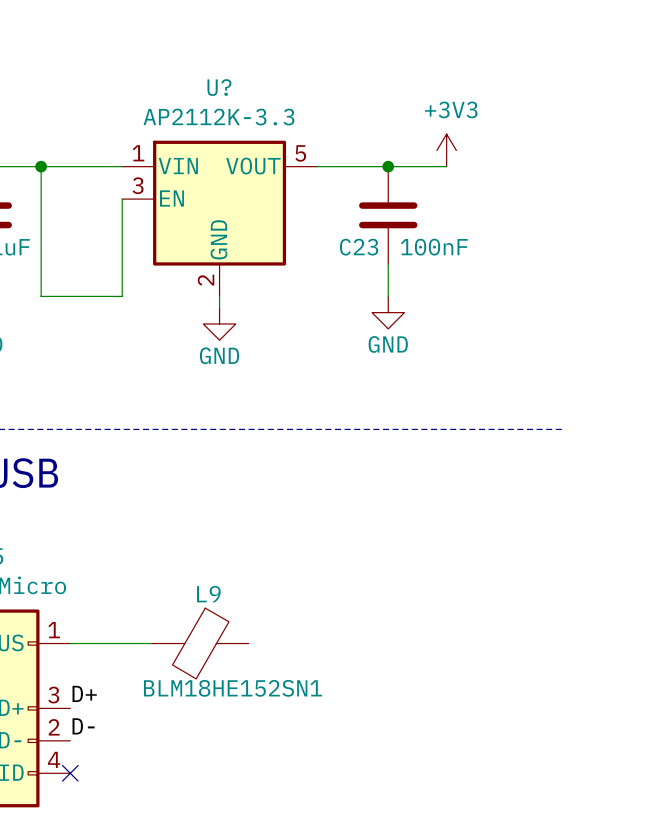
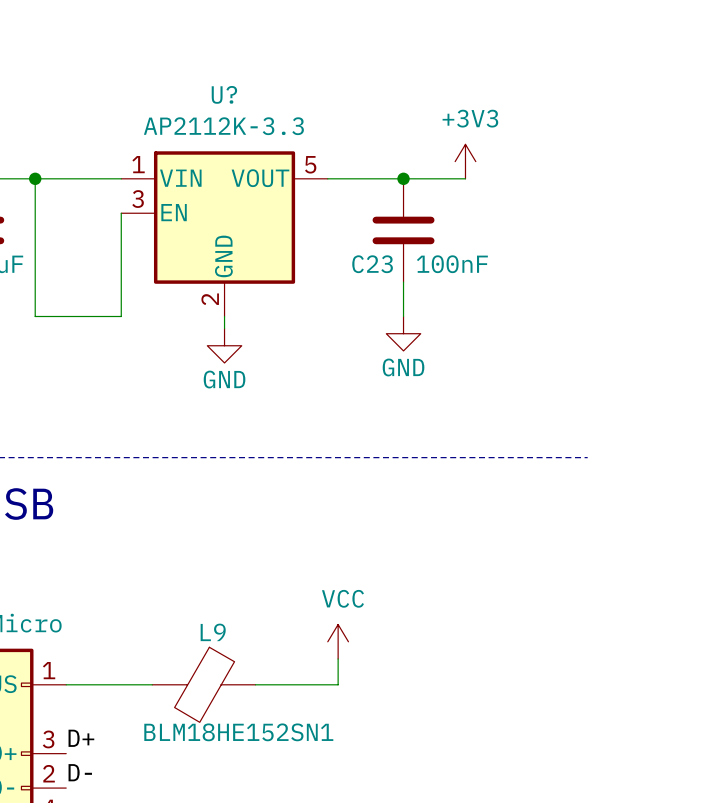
power symbol: none -> VCC (338, 641)
wire: none -> (338, 658) (338, 684) (255, 684)

